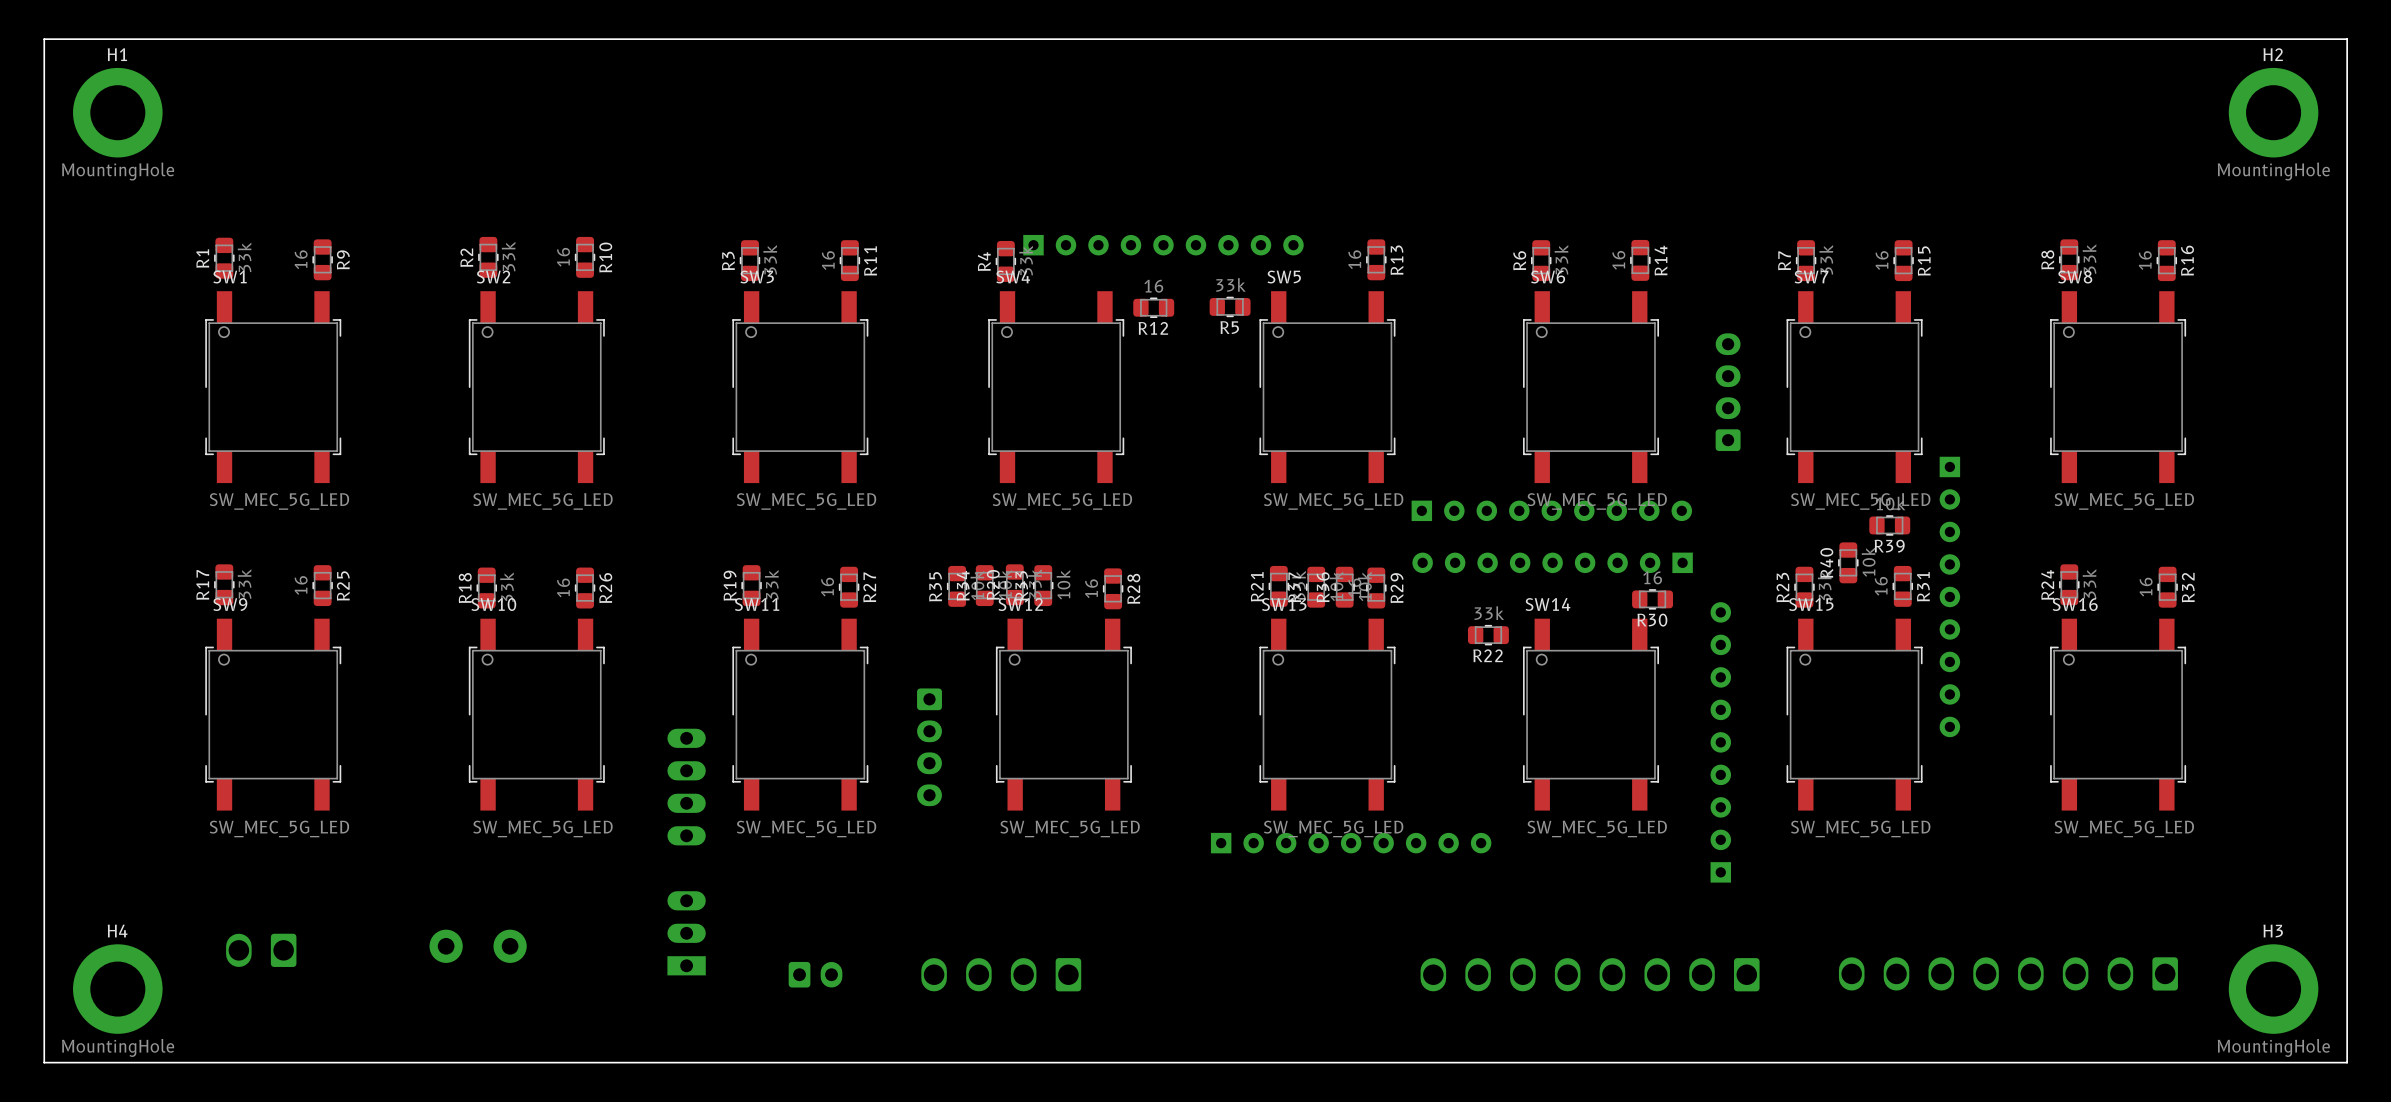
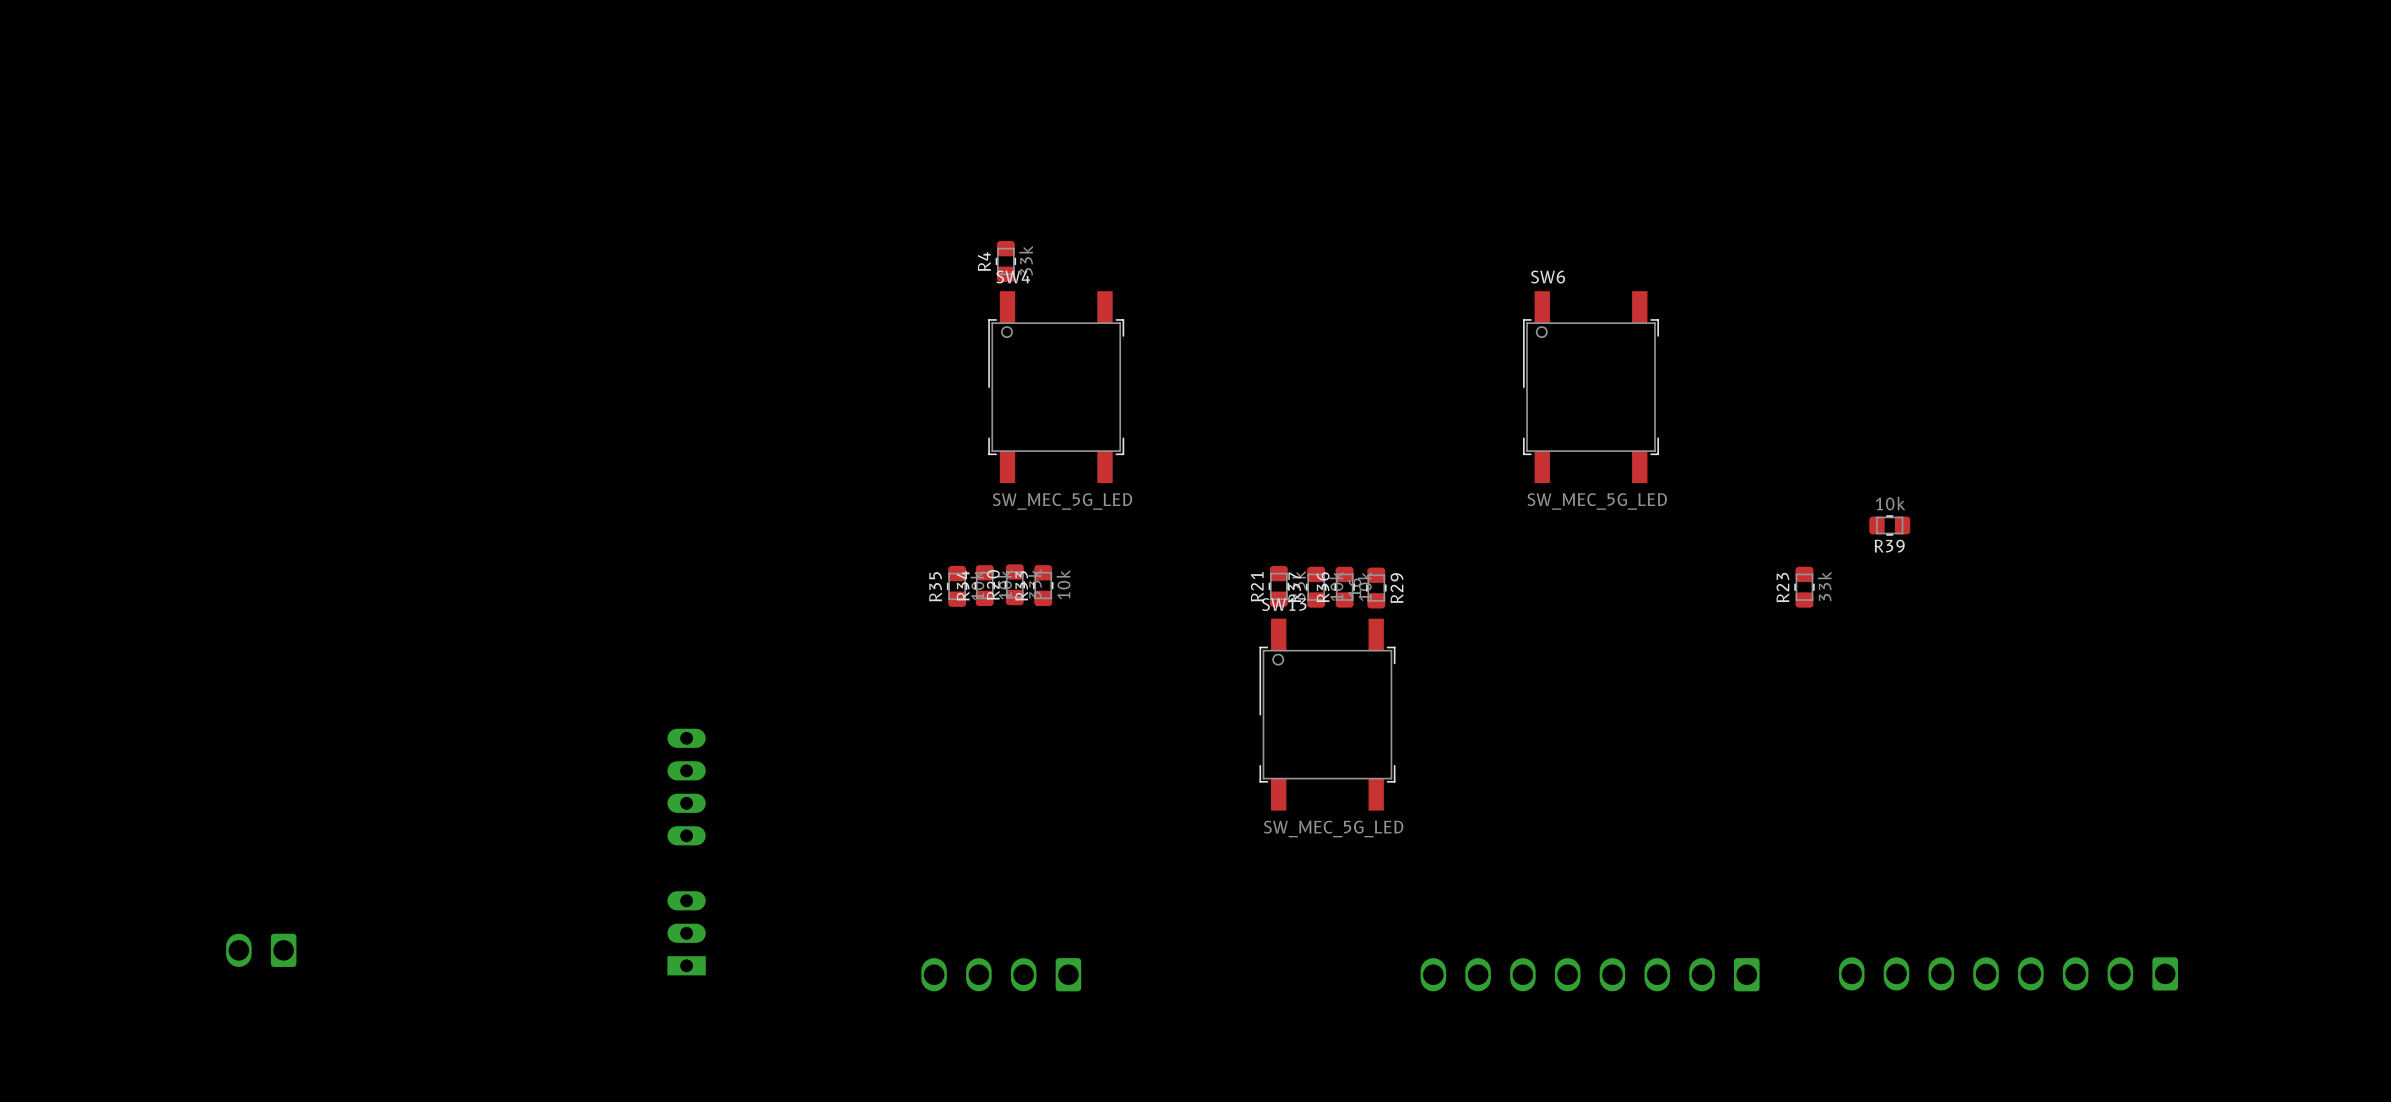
board edge: (44, 39) (44, 1062) (2347, 1062) (2347, 39) (44, 39) -> none
H1: MountingHole (117, 112) -> none
H2: MountingHole (2273, 112) -> none
part: (1163, 245) -> none
R2: 33k (488, 257) -> none
R10: 16 (585, 257) -> none
R1: 33k (224, 258) -> none
R9: 16 (322, 259) -> none
R13: 16 (1376, 259) -> none
R8: 33k (2069, 259) -> none
R3: 33k (749, 260) -> none
R11: 16 (849, 260) -> none
R6: 33k (1541, 260) -> none
R14: 16 (1640, 260) -> none
R7: 33k (1806, 260) -> none
R15: 16 (1903, 260) -> none
R16: 16 (2166, 260) -> none
R5: 33k (1230, 306) -> none
R12: 16 (1153, 307) -> none
SW1: SW_MEC_5G_LED (273, 387) -> none
SW2: SW_MEC_5G_LED (536, 387) -> none
SW3: SW_MEC_5G_LED (800, 387) -> none
SW5: SW_MEC_5G_LED (1327, 387) -> none
SW7: SW_MEC_5G_LED (1854, 387) -> none
SW8: SW_MEC_5G_LED (2118, 387) -> none
part: (1728, 392) -> none
part: (1551, 510) -> none
part: (1552, 562) -> none
R40: 10k (1848, 562) -> none
R17: 33k (224, 584) -> none
R24: 33k (2069, 584) -> none
R25: 16 (322, 585) -> none
R19: 33k (751, 585) -> none
R31: 16 (1902, 586) -> none
R27: 16 (849, 587) -> none
R32: 16 (2167, 587) -> none
R18: 33k (486, 588) -> none
R26: 16 (585, 588) -> none
R28: 16 (1113, 588) -> none
part: (1949, 596) -> none
R30: 16 (1652, 599) -> none
R22: 33k (1488, 635) -> none
SW9: SW_MEC_5G_LED (273, 714) -> none
SW10: SW_MEC_5G_LED (536, 714) -> none
SW11: SW_MEC_5G_LED (800, 714) -> none
SW12: SW_MEC_5G_LED (1063, 714) -> none
SW14: SW_MEC_5G_LED (1591, 714) -> none
SW15: SW_MEC_5G_LED (1854, 714) -> none
SW16: SW_MEC_5G_LED (2118, 714) -> none
part: (1720, 742) -> none
part: (929, 747) -> none
part: (1351, 843) -> none
part: (478, 946) -> none
part: (815, 974) -> none
H4: MountingHole (117, 989) -> none
H3: MountingHole (2273, 989) -> none

